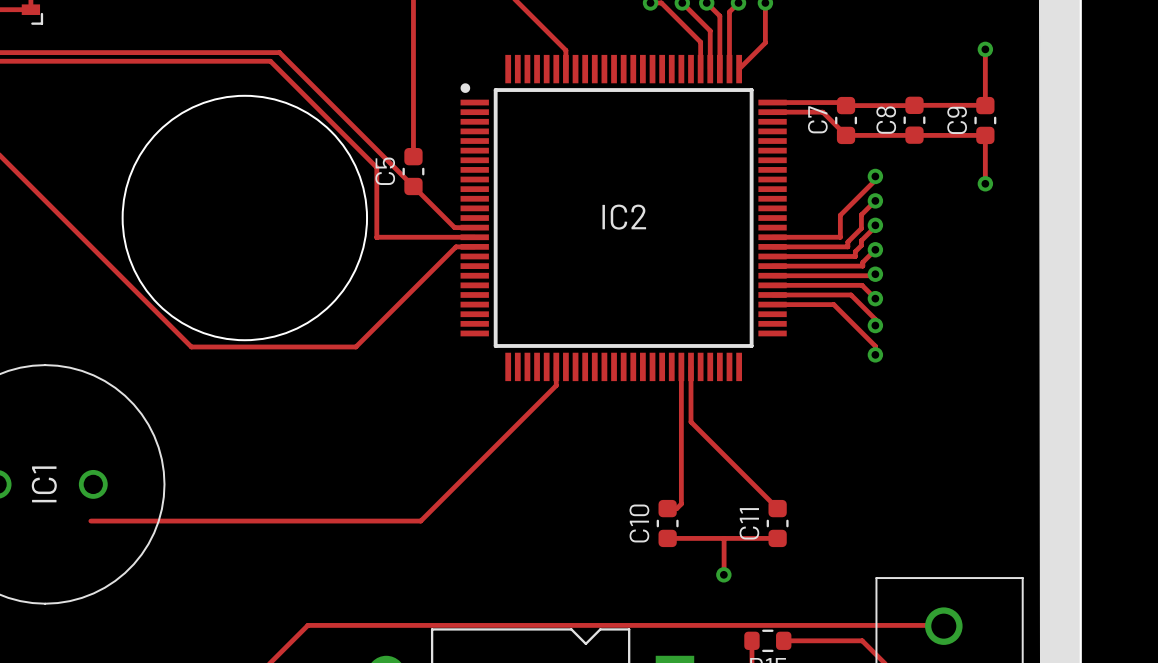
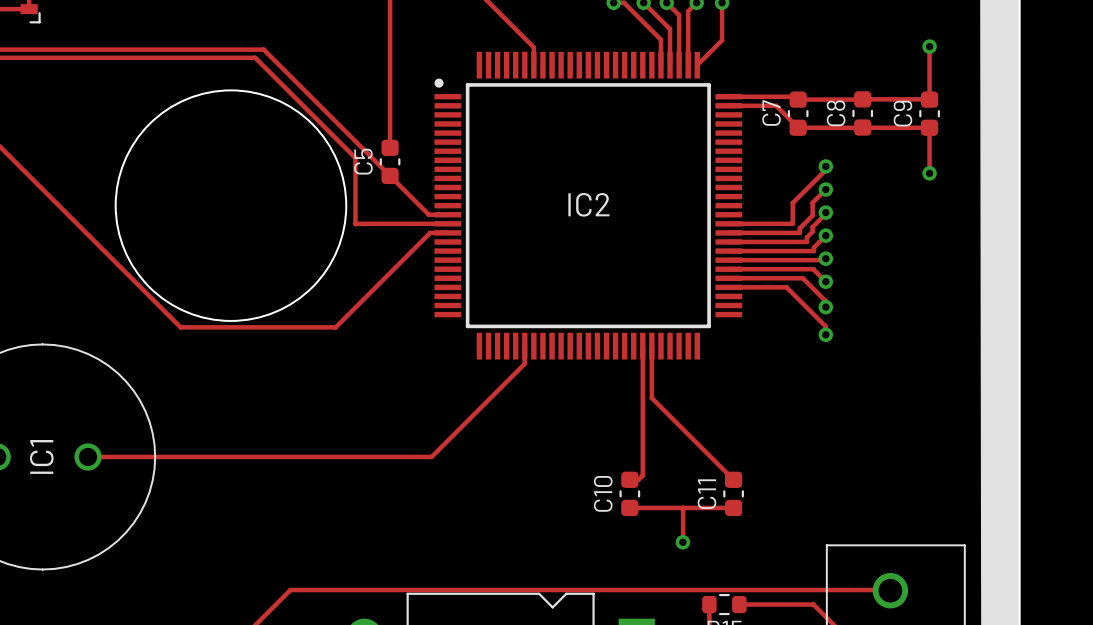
track: (457, 484) (420, 521) (90, 521) -> (431, 456) (88, 456)

